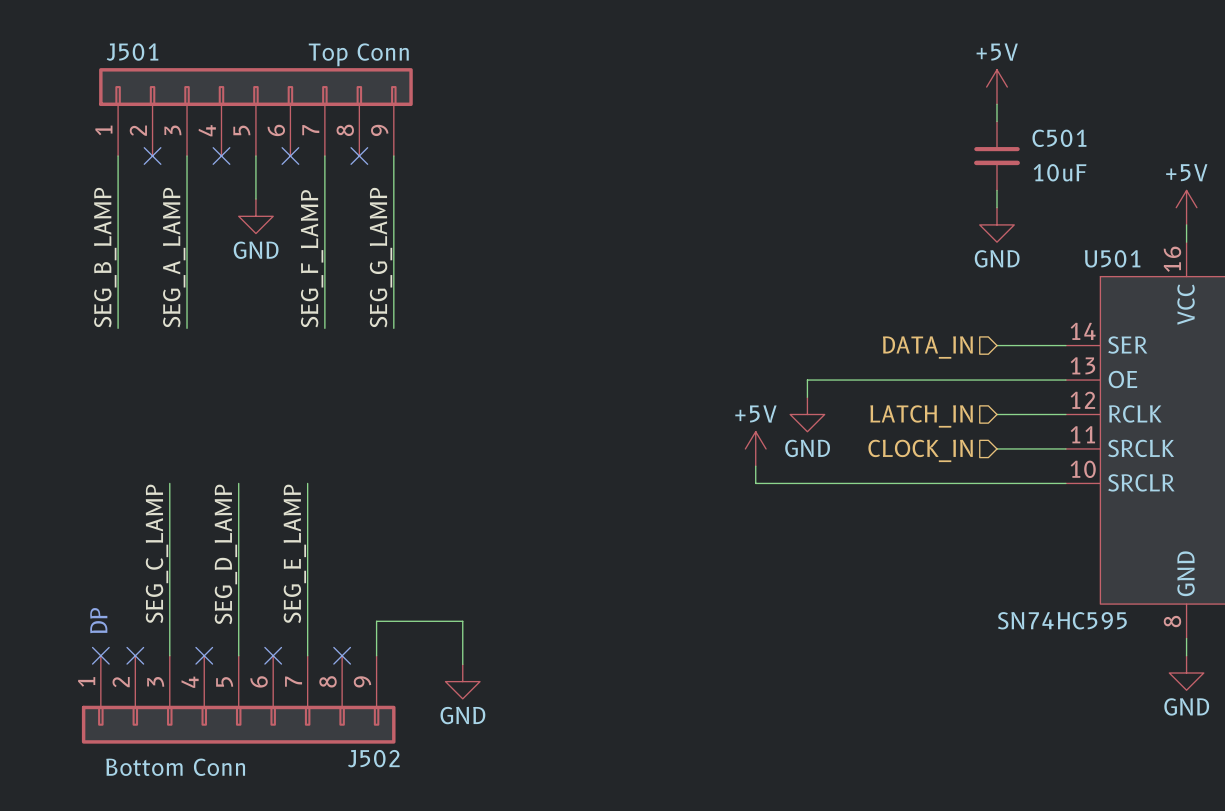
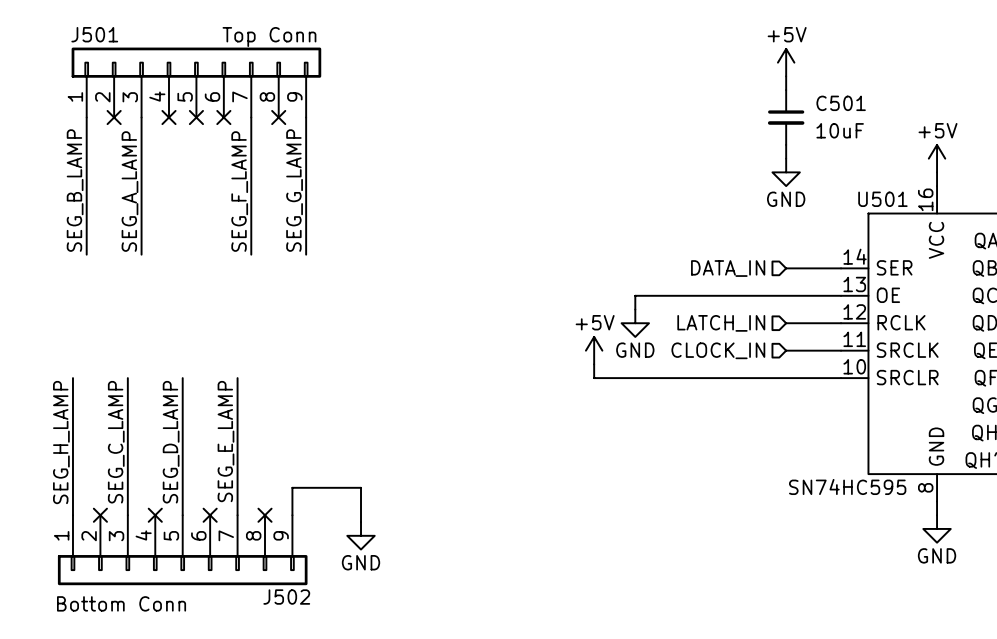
wire: (255, 155) (255, 199) -> none
no-connect mark: none -> (196, 117)
power symbol: GND (255, 216) -> none
wire: none -> (72, 378) (72, 515)
label: none -> SEG_H_LAMP (61, 442)
text: DP (98, 620) -> none
no-connect mark: (100, 655) -> none

